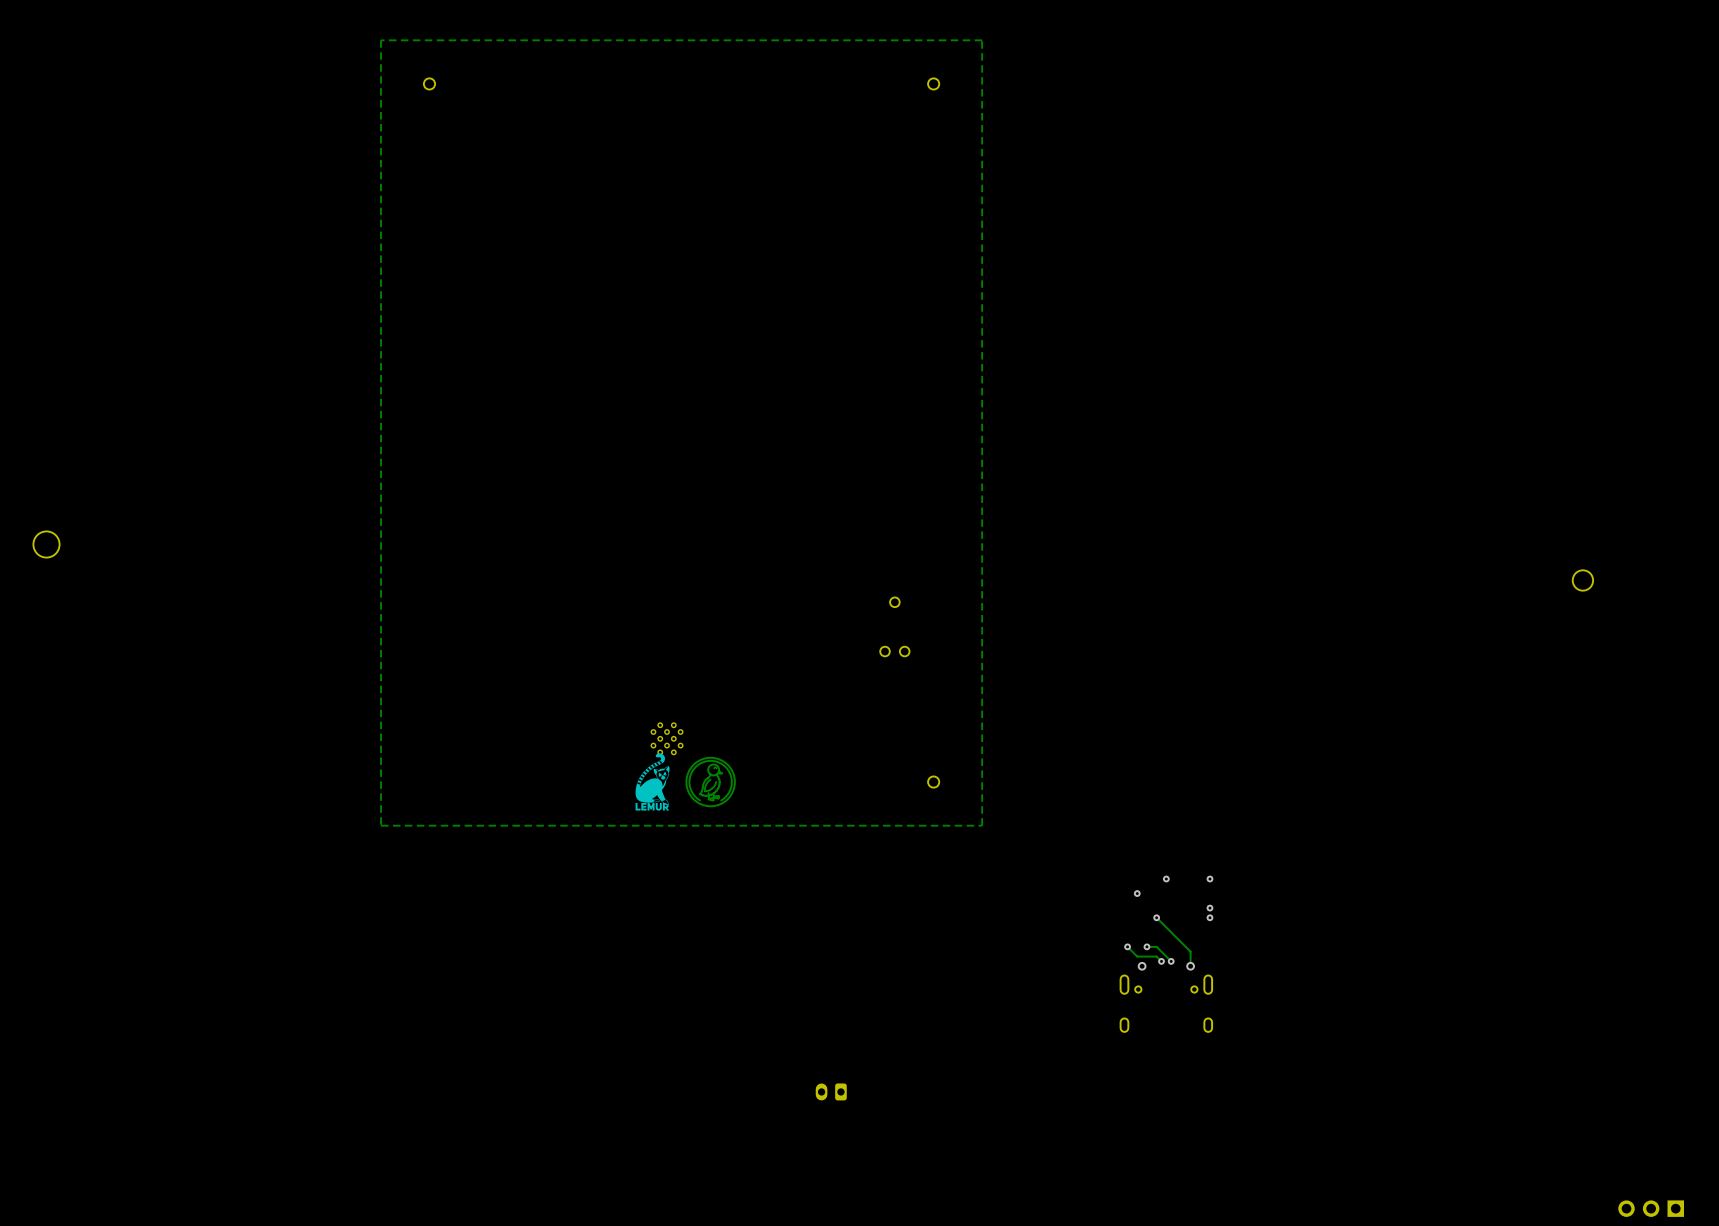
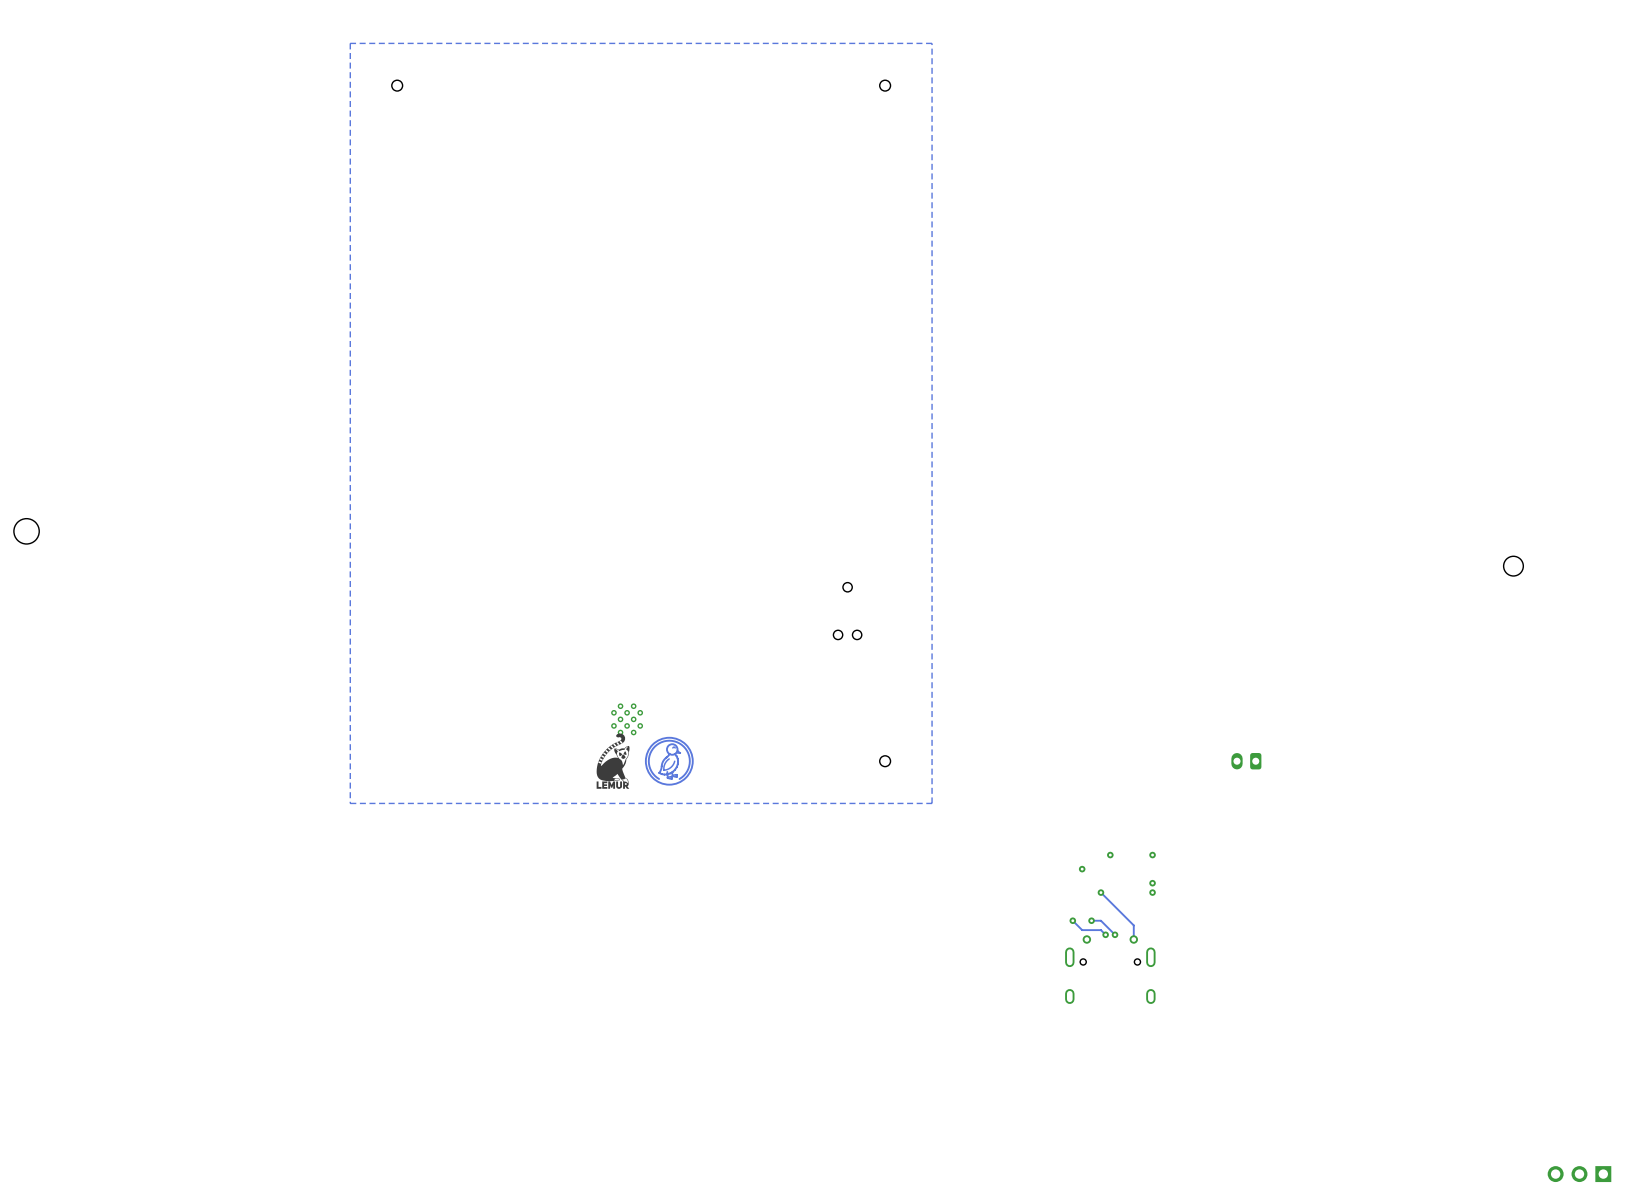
part: none -> (1246, 761)
part: (831, 1091) -> none

